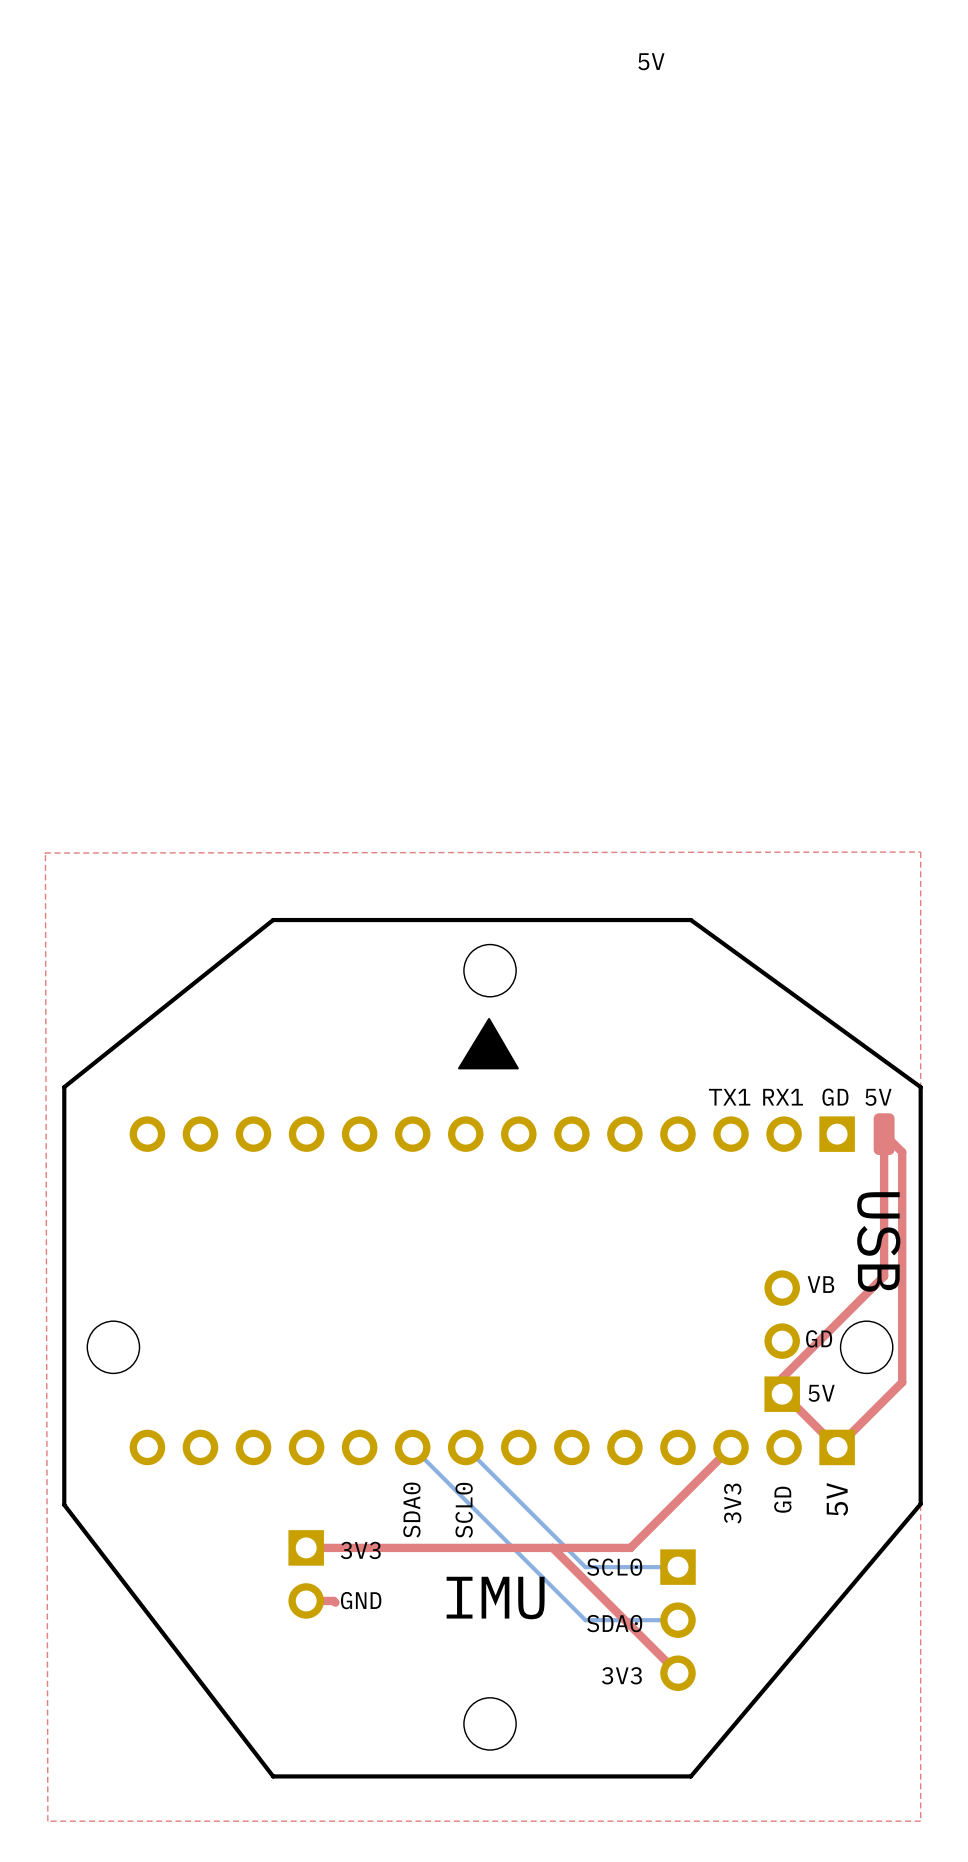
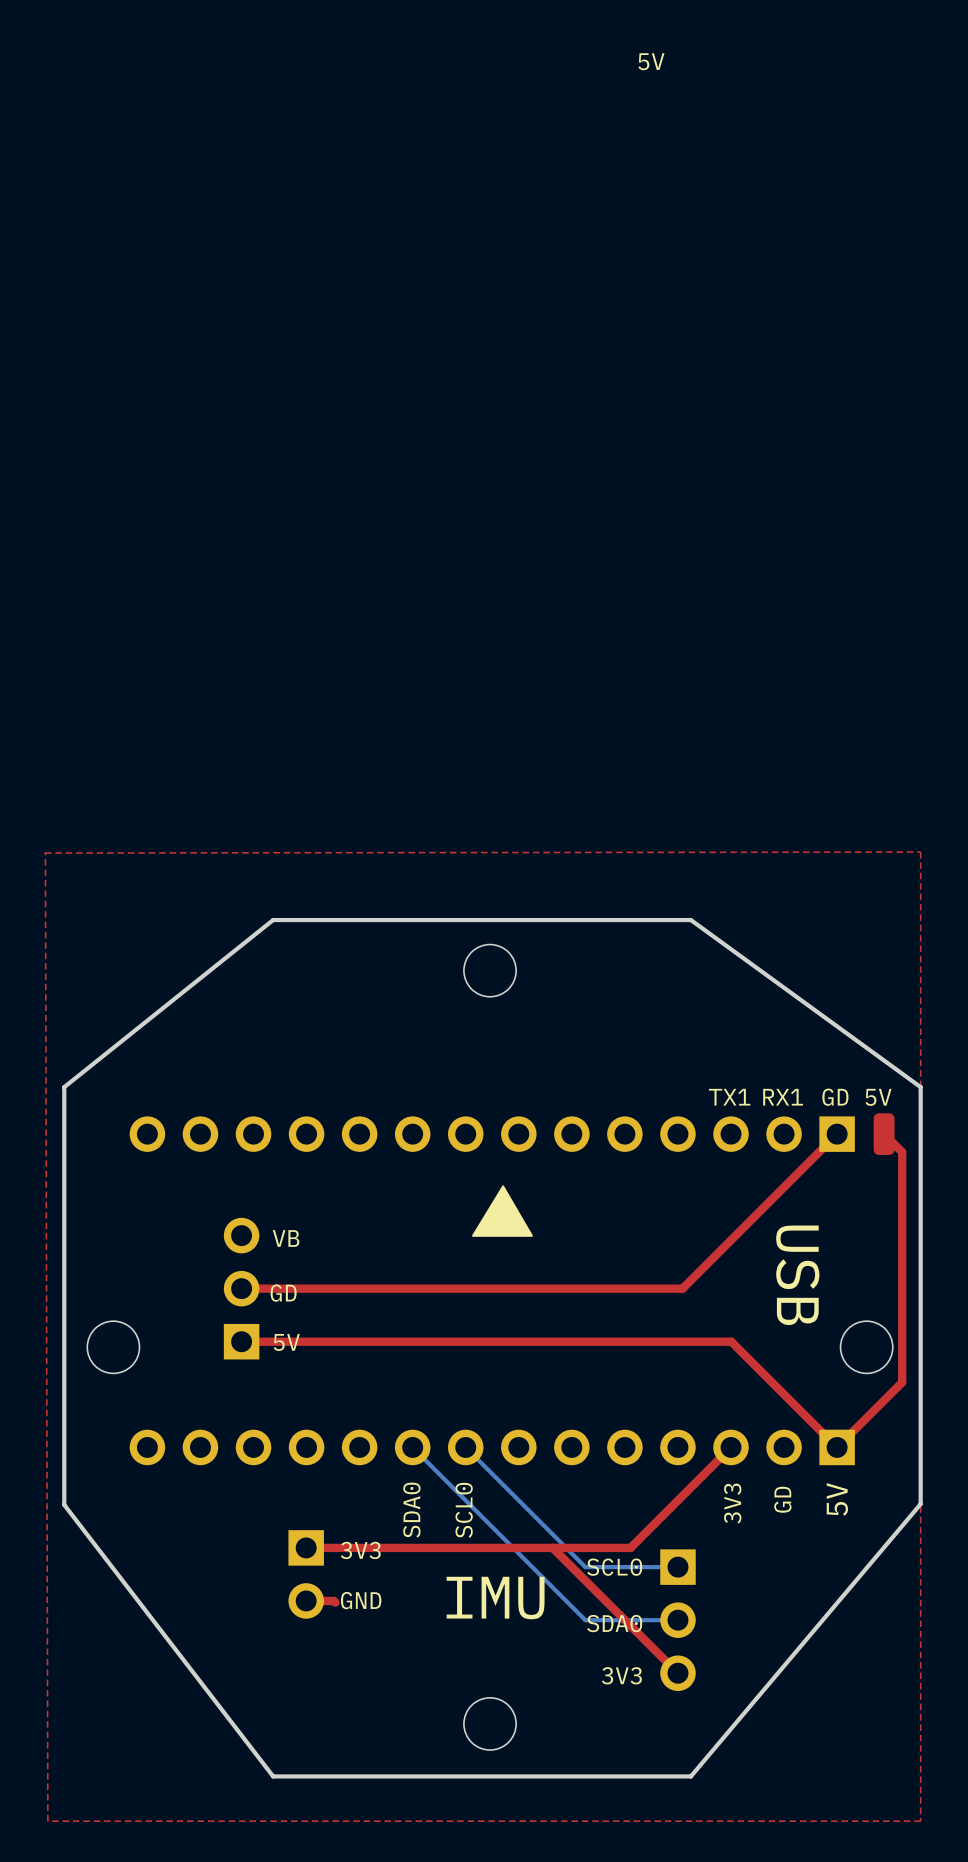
drawing position: (488, 1043) -> (502, 1211)
top track: none -> (837, 1134) (682, 1288) (241, 1288)
top track: (884, 1134) (884, 1276) (782, 1378) (782, 1394) (783, 1394) -> (241, 1341) (731, 1341) (783, 1394)
text: none -> VB (286, 1238)
text position: USB (878, 1241) -> USB (797, 1275)
text: VB (820, 1284) -> none
part: none -> (241, 1288)
text: none -> GD (283, 1293)
text: GD (819, 1338) -> none
part: (782, 1341) -> none
text: none -> 5V (286, 1342)
text: 5V (821, 1393) -> none

